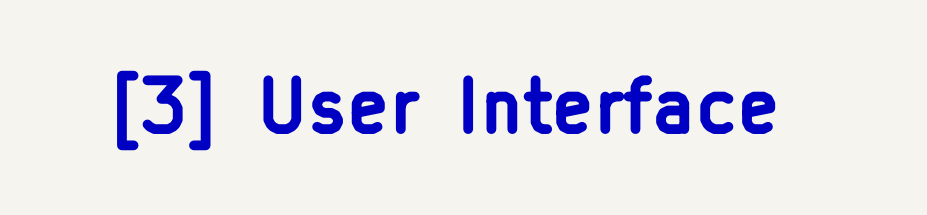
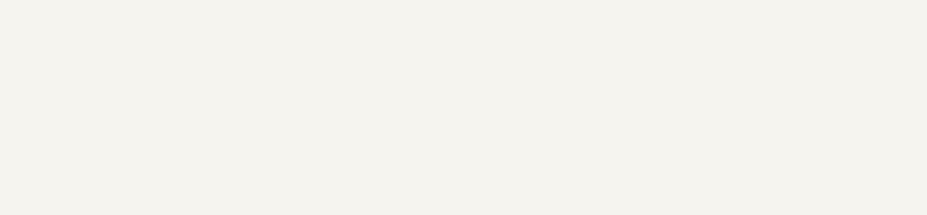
text: [3] User Interface (446, 110) -> none

